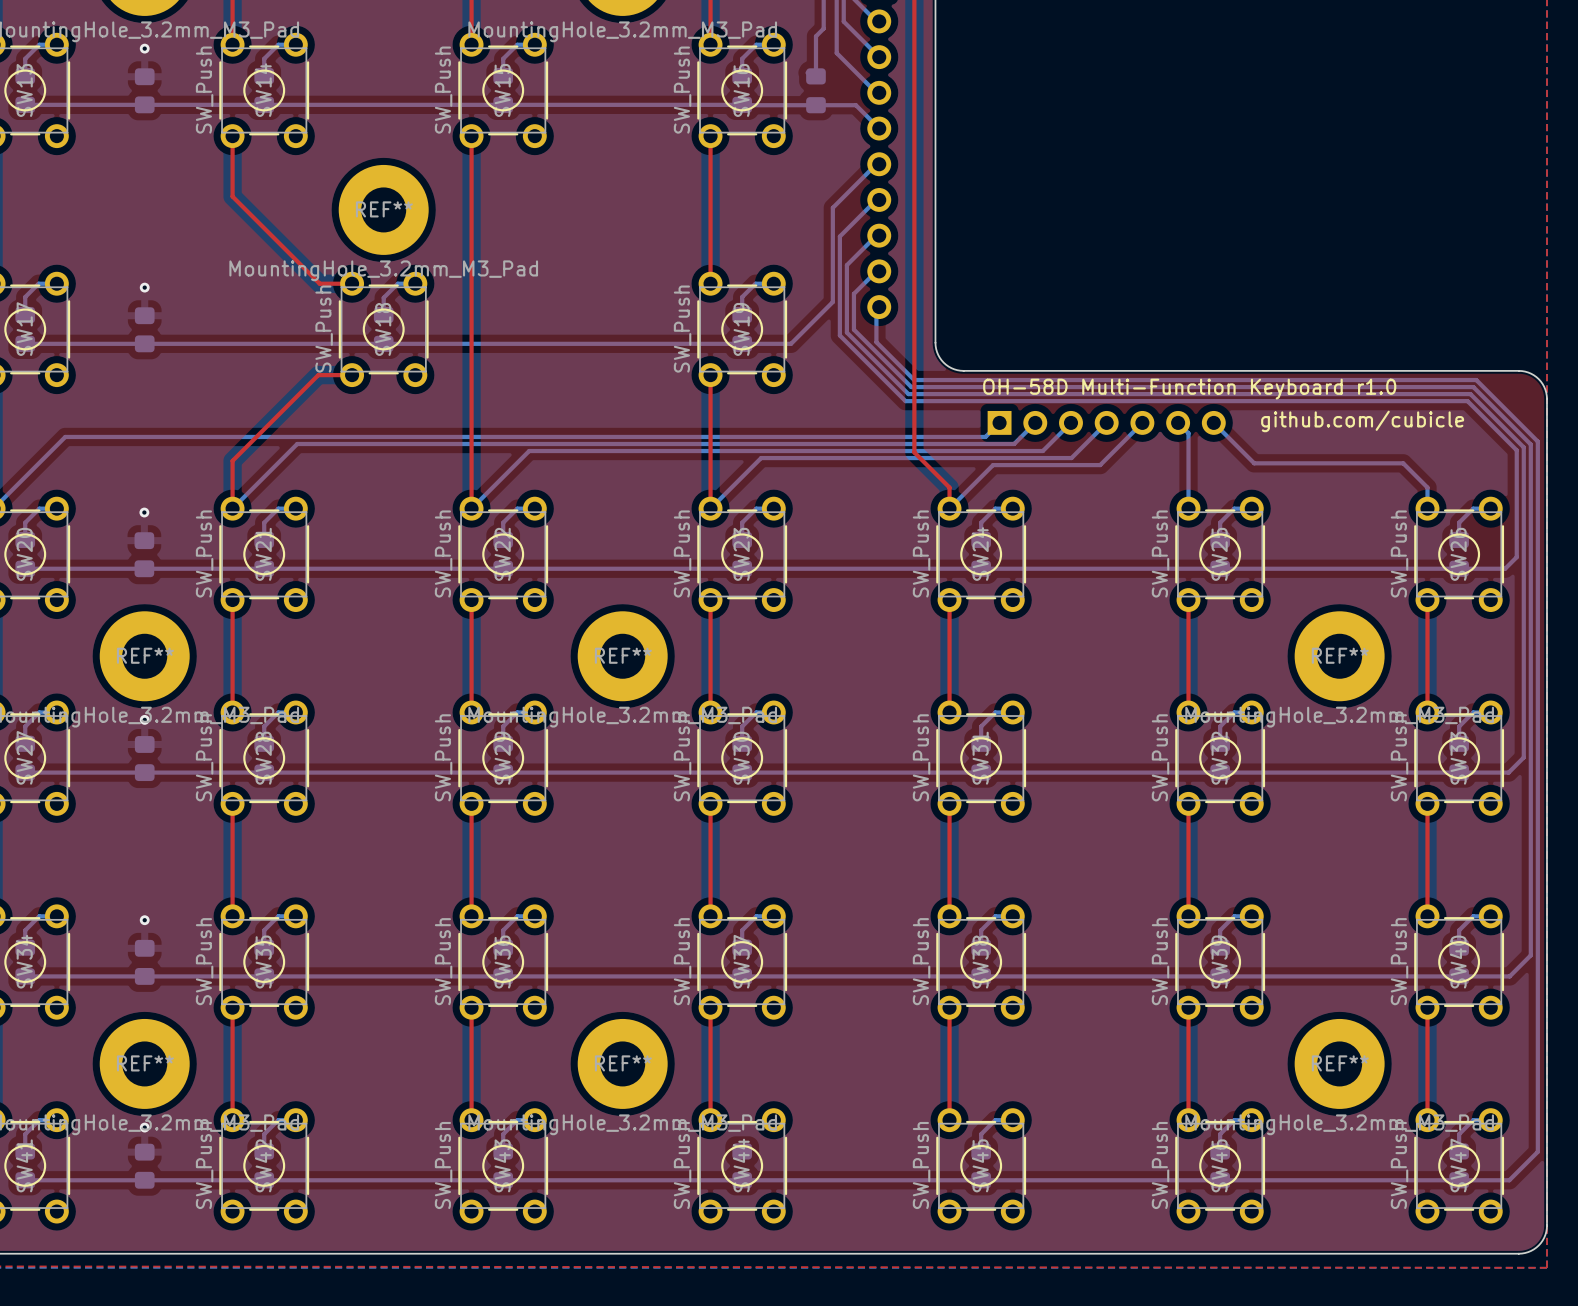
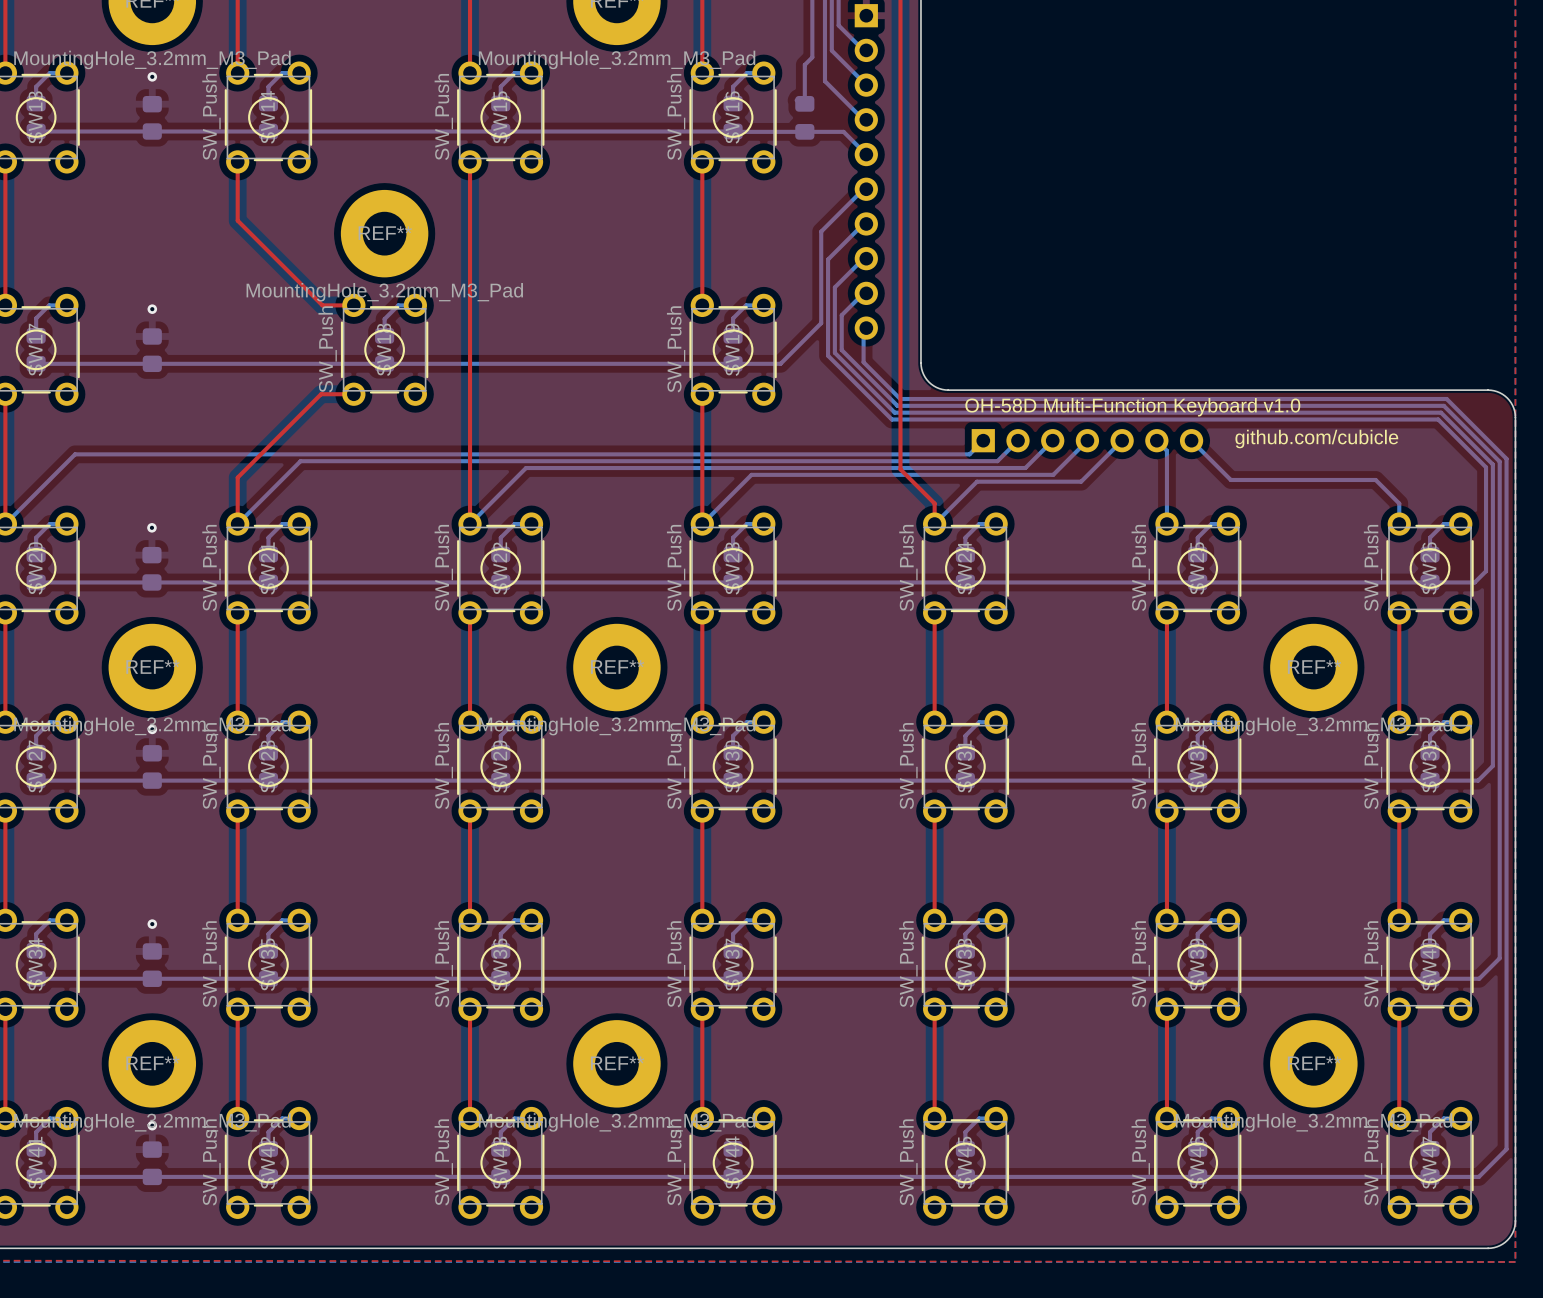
text: OH-58D Multi-Function Keyboard r1.0 (1189, 389) -> OH-58D Multi-Function Keyboard v1.0 (1132, 407)

